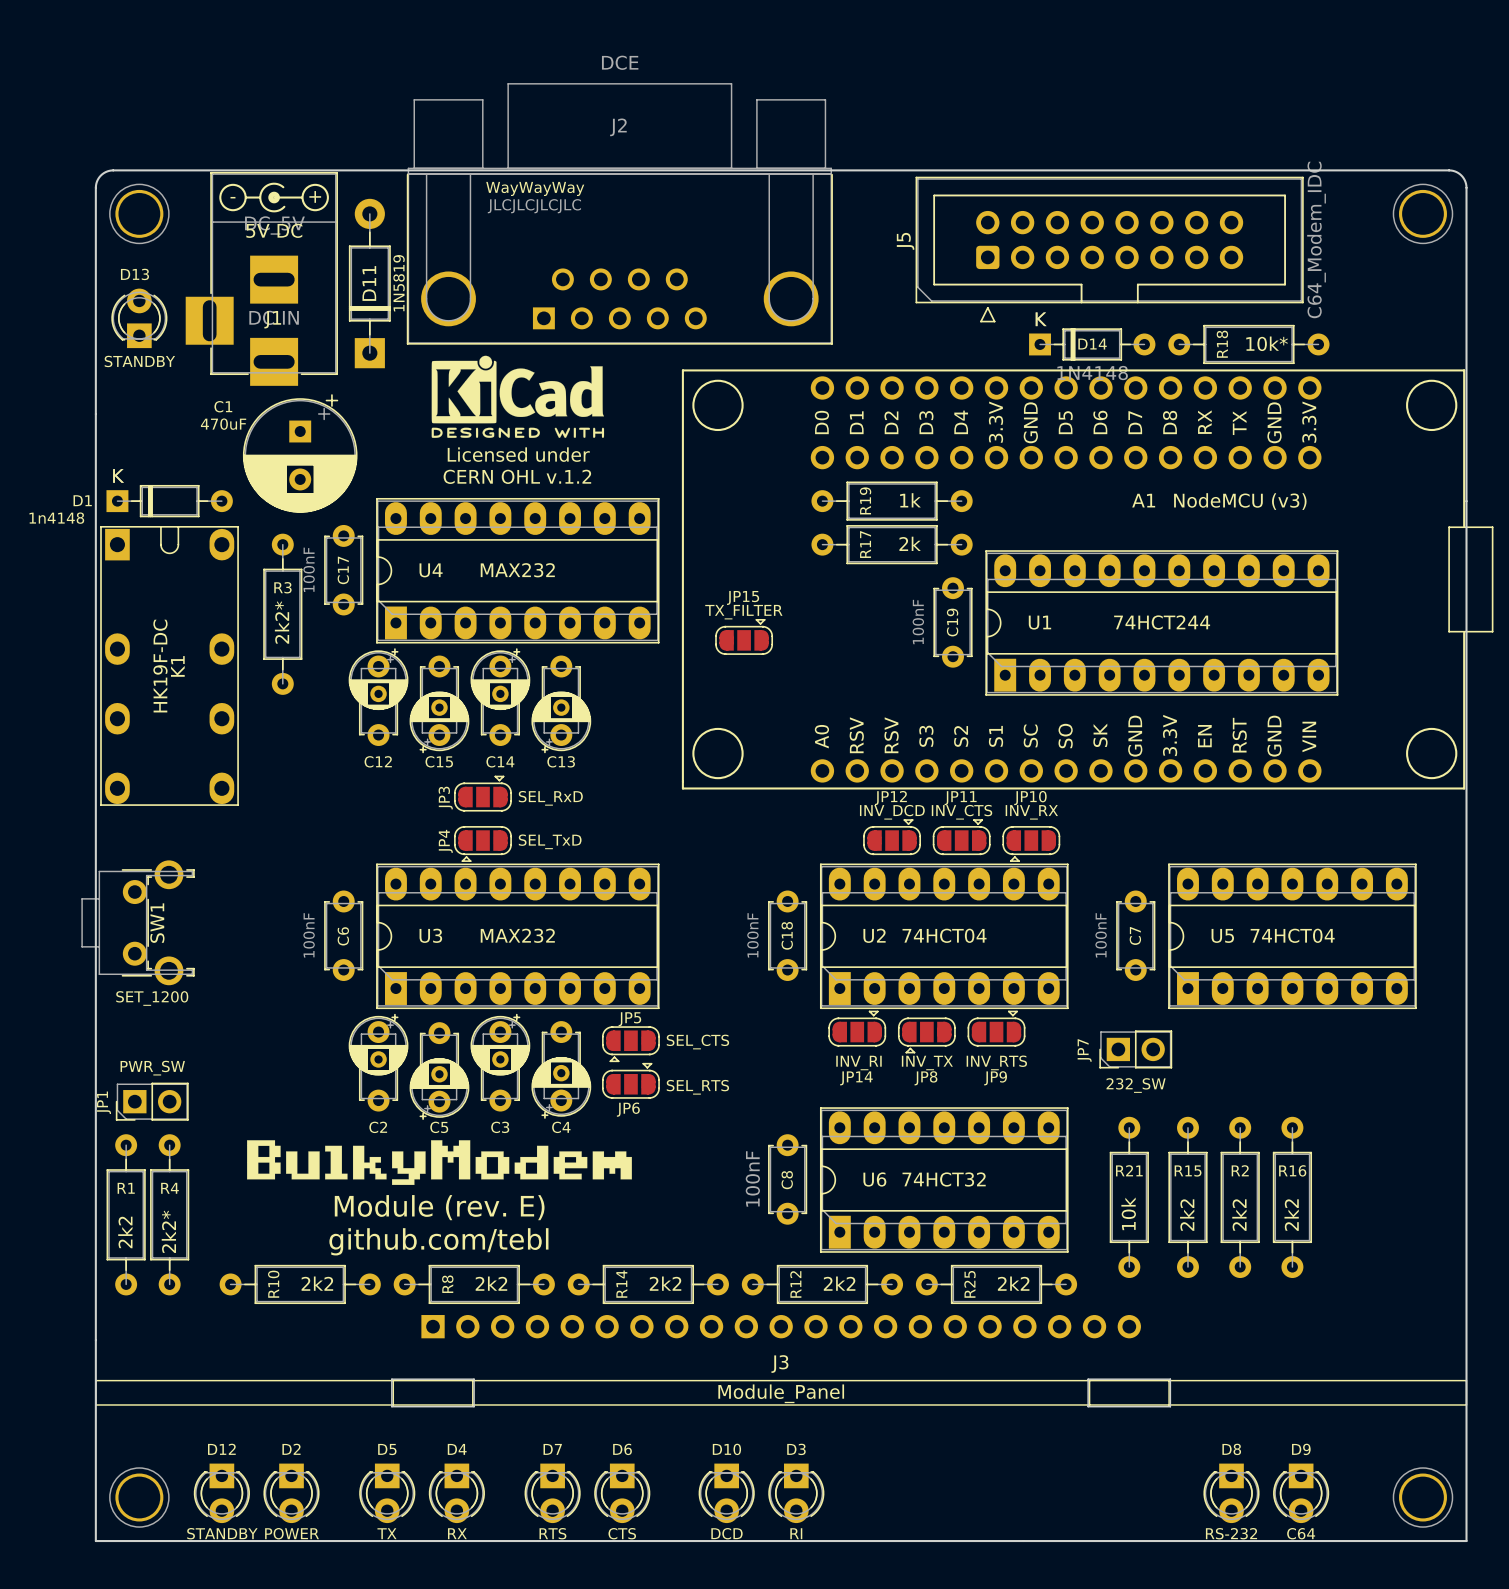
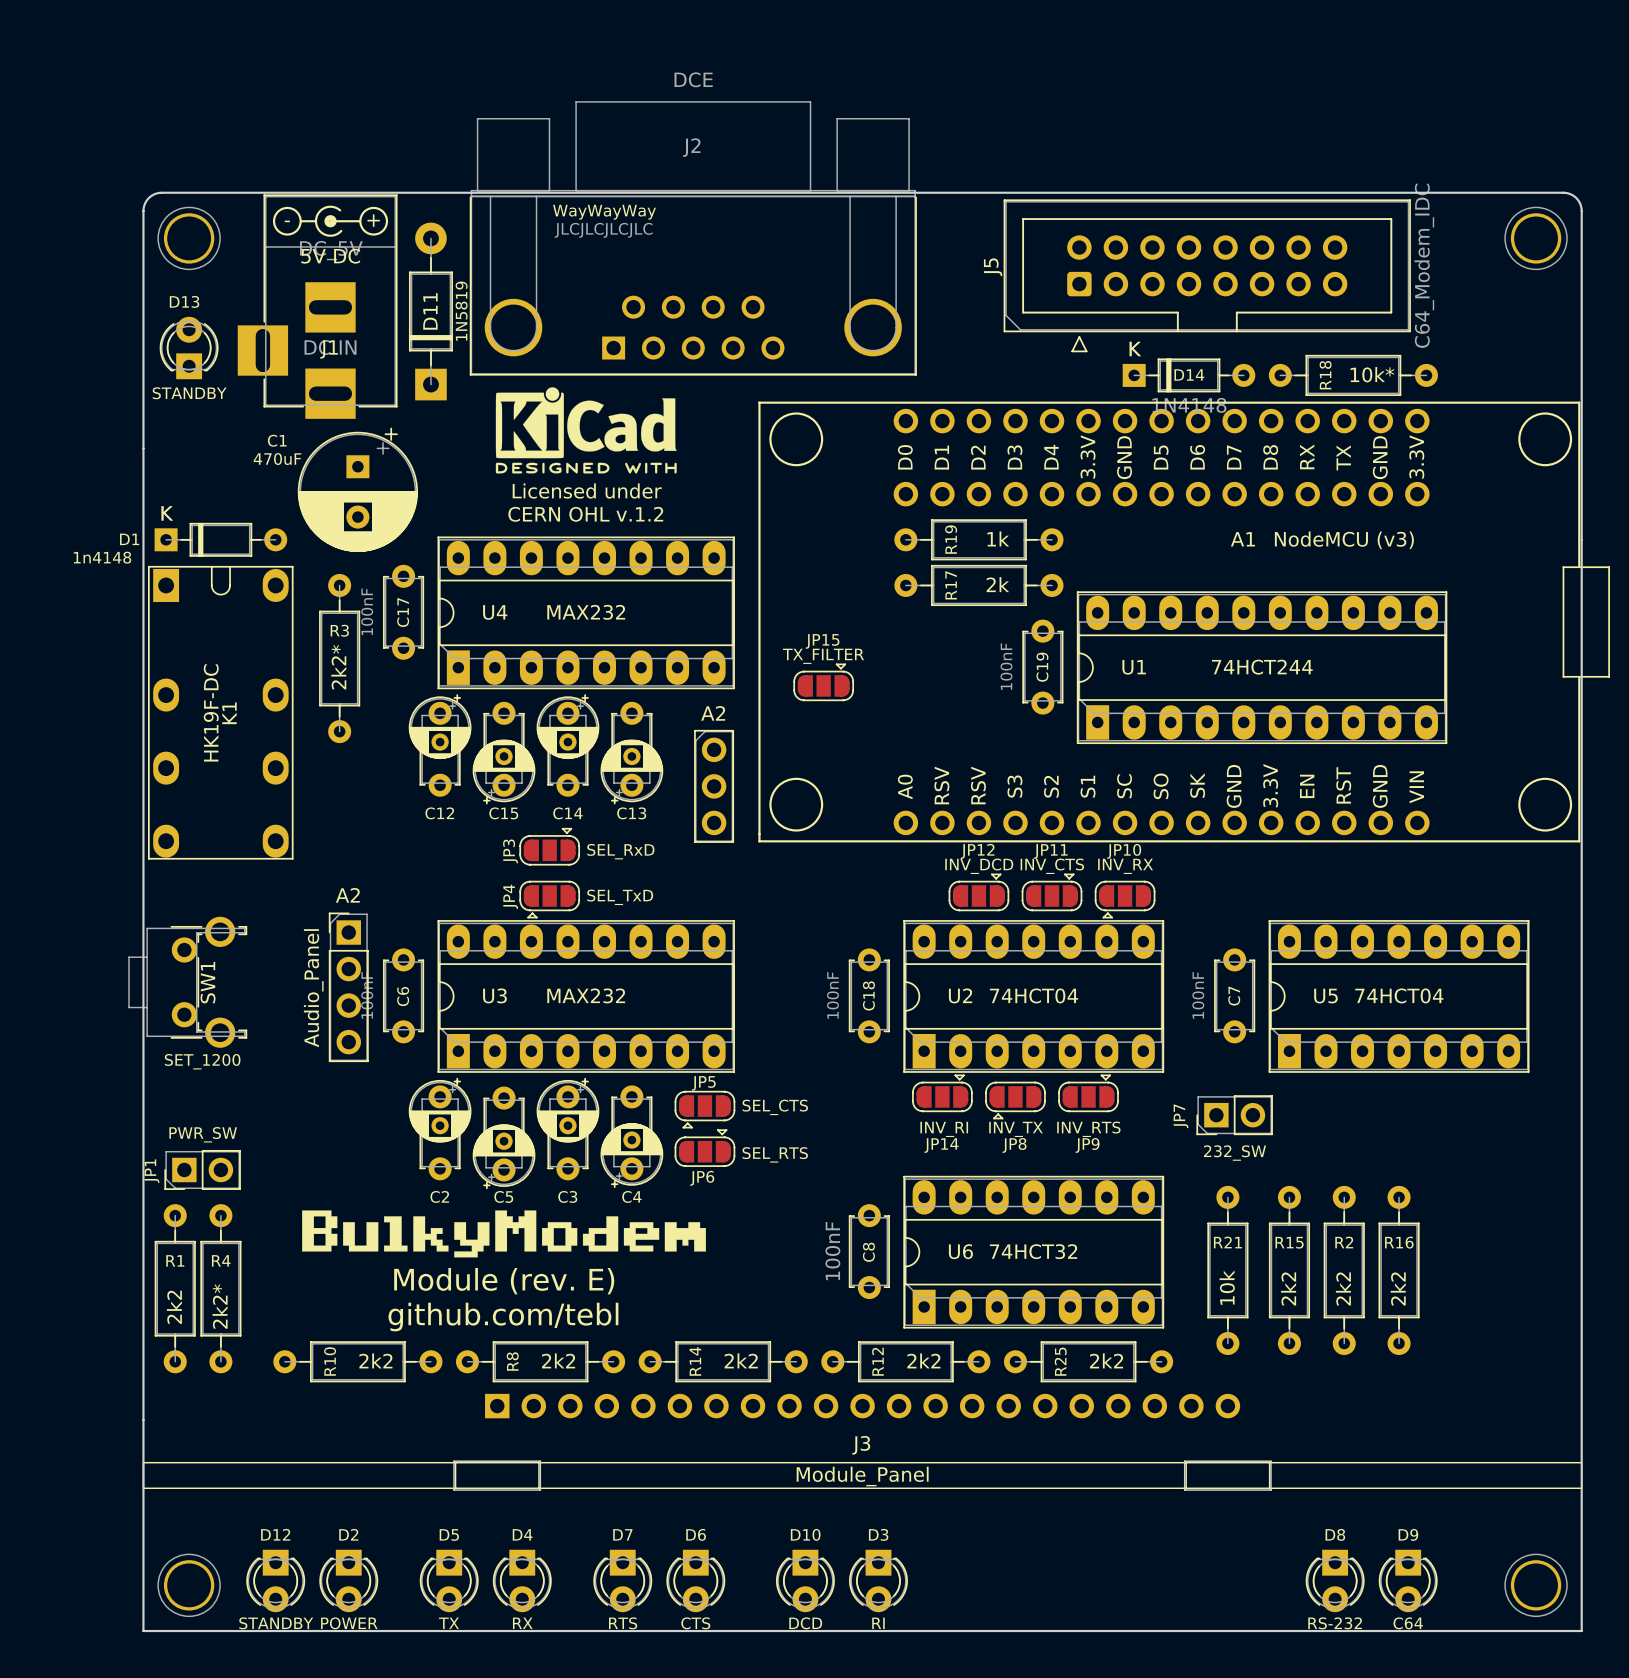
text: none -> A2 (713, 713)
A2: none -> Audio_Panel (531, 895)

